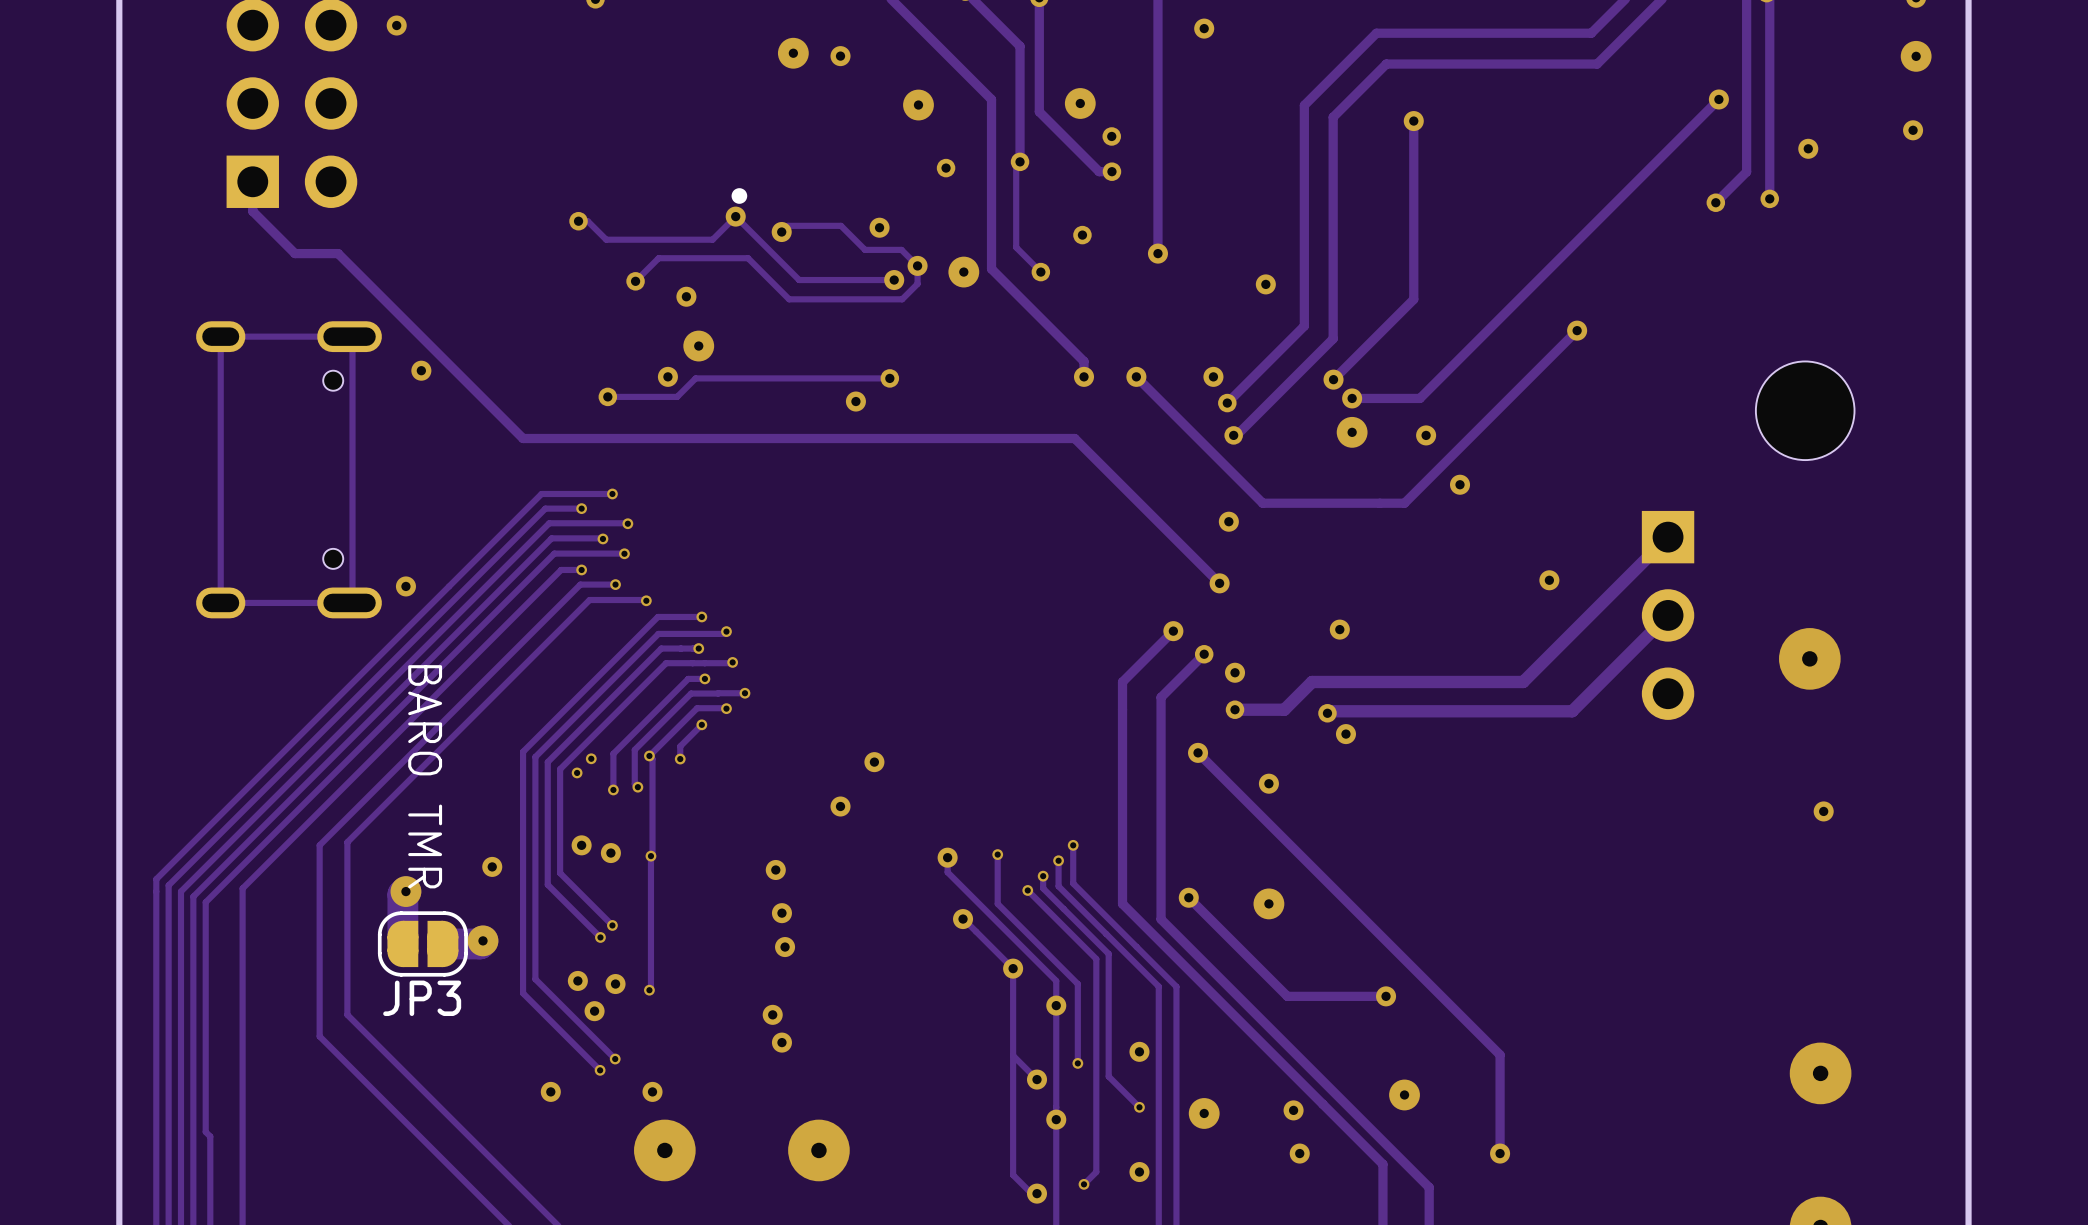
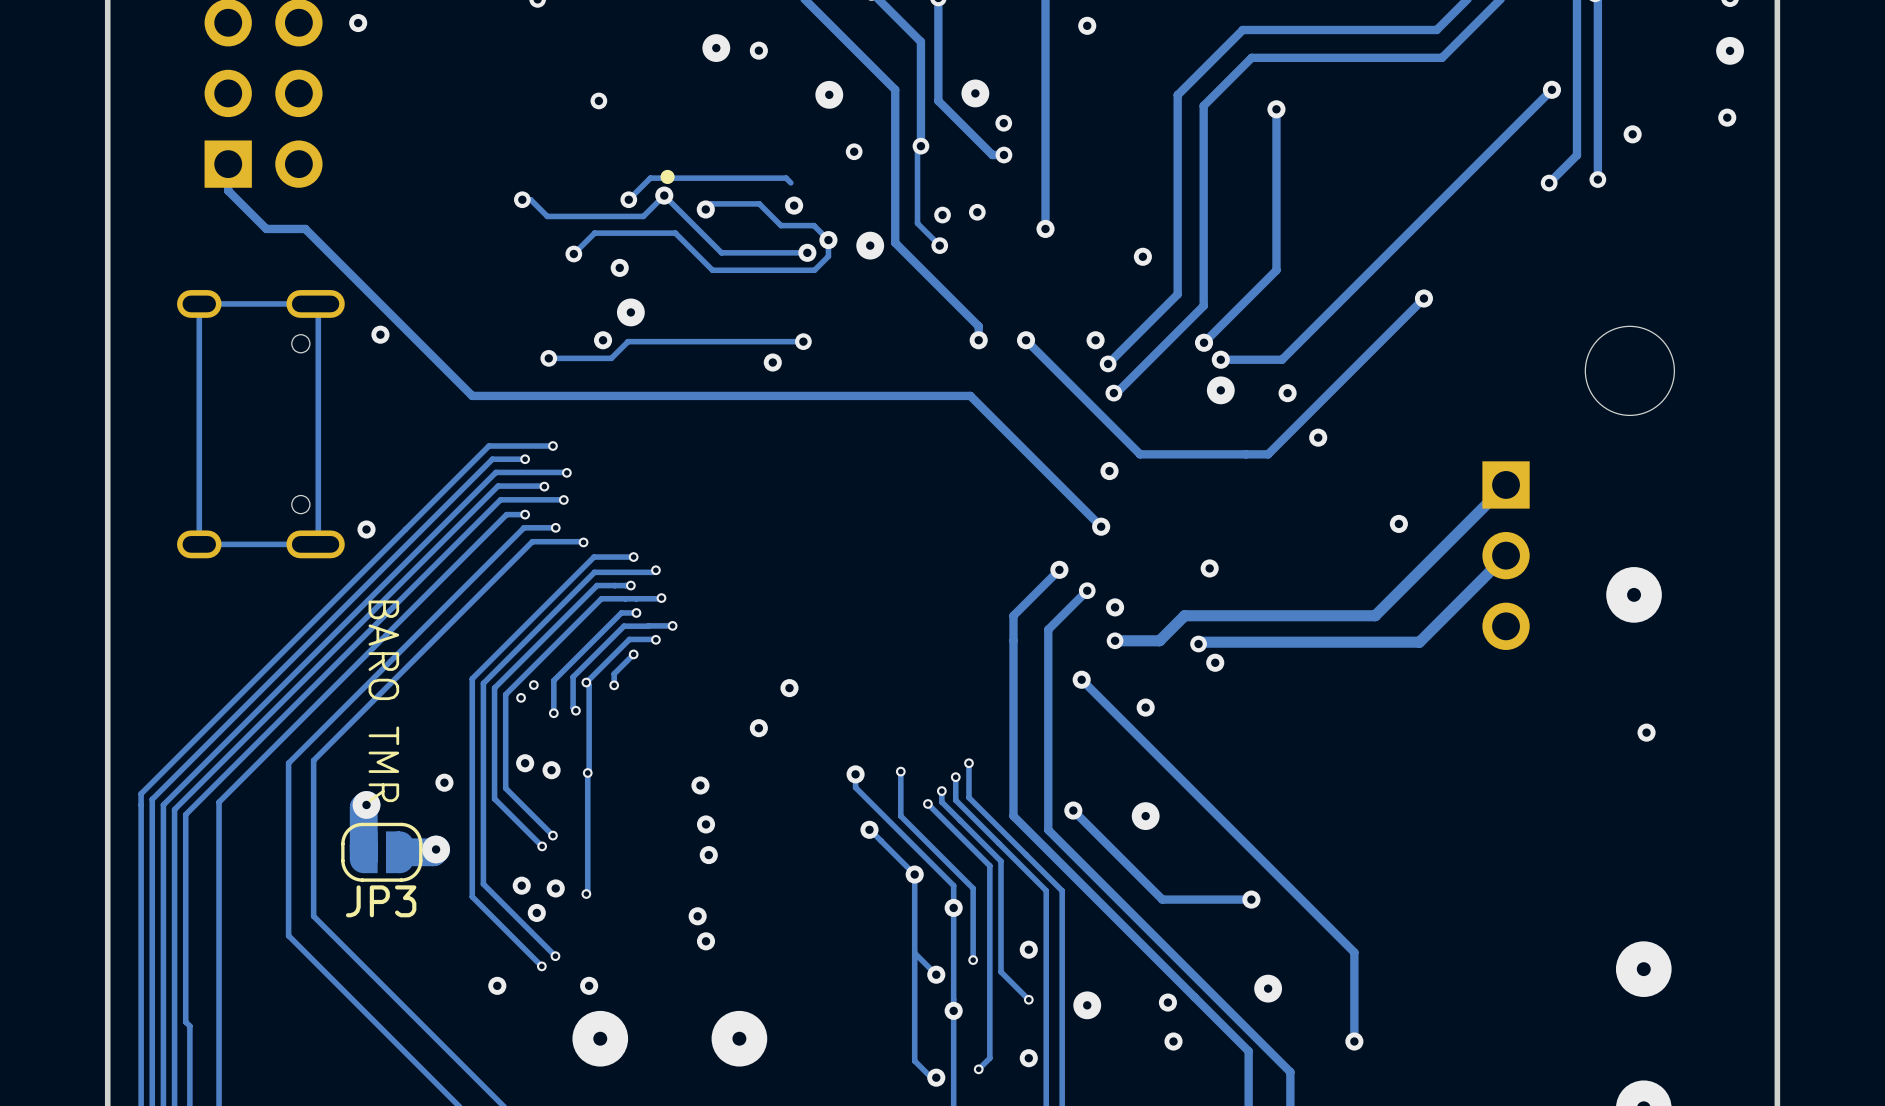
via: none -> (598, 100)
track: none -> (790, 182) (786, 178) (650, 178) (628, 199)
via: none -> (628, 199)
via: none -> (942, 215)

